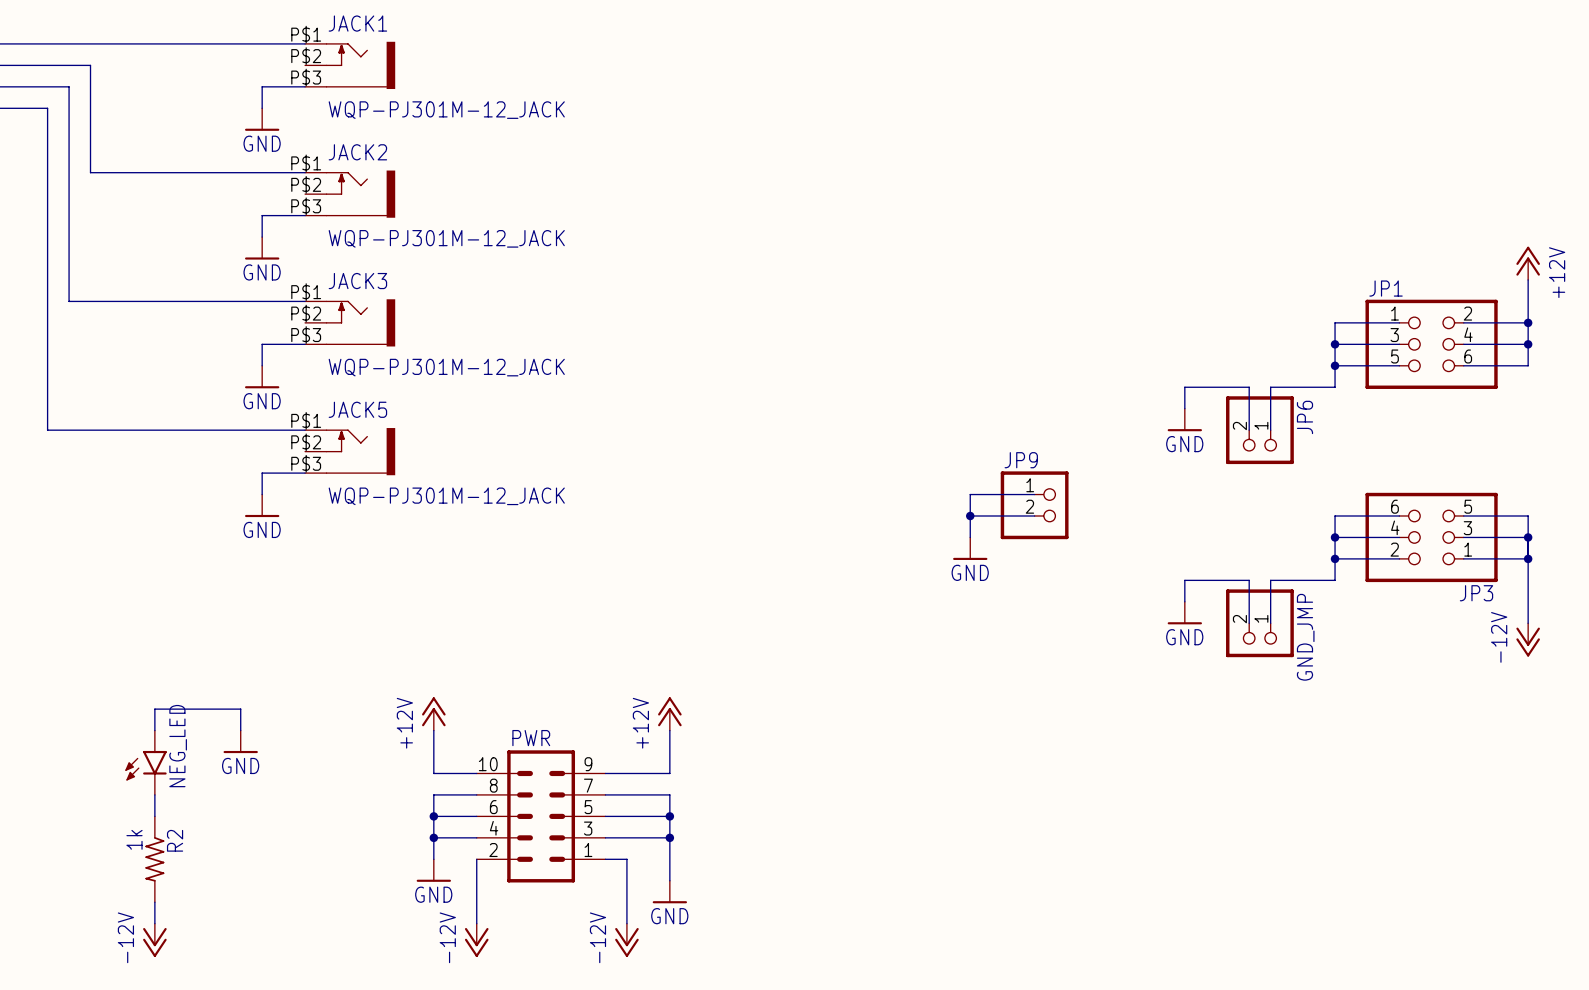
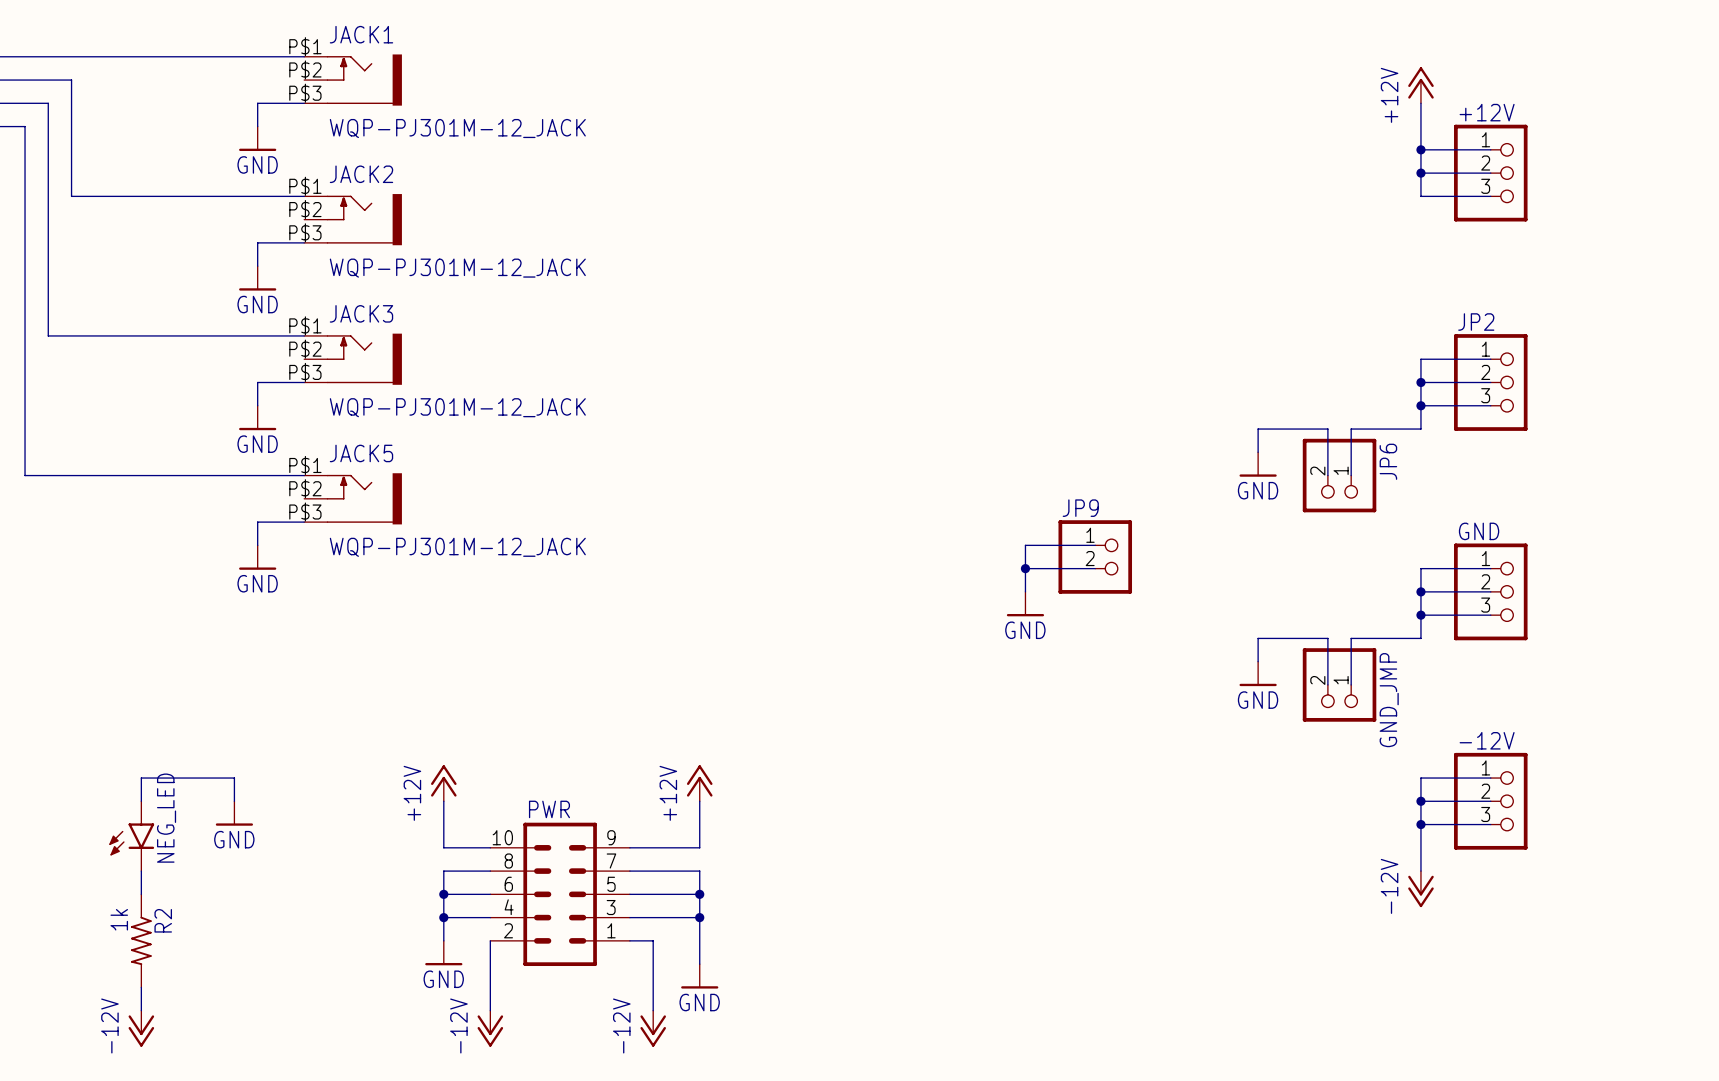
power symbol: none -> +12V (1420, 85)
wire: none -> (1420, 103) (1420, 196) (1490, 196)
wire: none -> (1420, 149) (1490, 149)
junction: none -> (1420, 149)
wire: none -> (1420, 173) (1490, 173)
junction: none -> (1420, 173)
+12V: none -> (1490, 173)
power symbol: +12V (1528, 263) -> none
wire: (1528, 279) (1528, 365) (1463, 365) -> none
wire: (1463, 322) (1528, 322) -> none
junction: (1528, 322) -> none
JP2: none -> (1490, 382)
JP1: (1431, 344) -> none
wire: (1463, 344) (1528, 344) -> none
junction: (1528, 344) -> none
wire: (1463, 516) (1528, 516) (1528, 623) -> none
GND: none -> (1490, 591)
JP3: (1431, 537) -> none
wire: (1463, 537) (1528, 537) -> none
junction: (1528, 537) -> none
wire: (1463, 558) (1528, 558) -> none
junction: (1528, 558) -> none
power symbol: -12V (1528, 639) -> none
wire: none -> (1490, 778) (1420, 778) (1420, 871)
wire: none -> (1420, 801) (1490, 801)
junction: none -> (1420, 801)
-12V: none -> (1490, 801)
wire: none -> (1420, 824) (1490, 824)
junction: none -> (1420, 824)
power symbol: none -> -12V (1420, 889)

